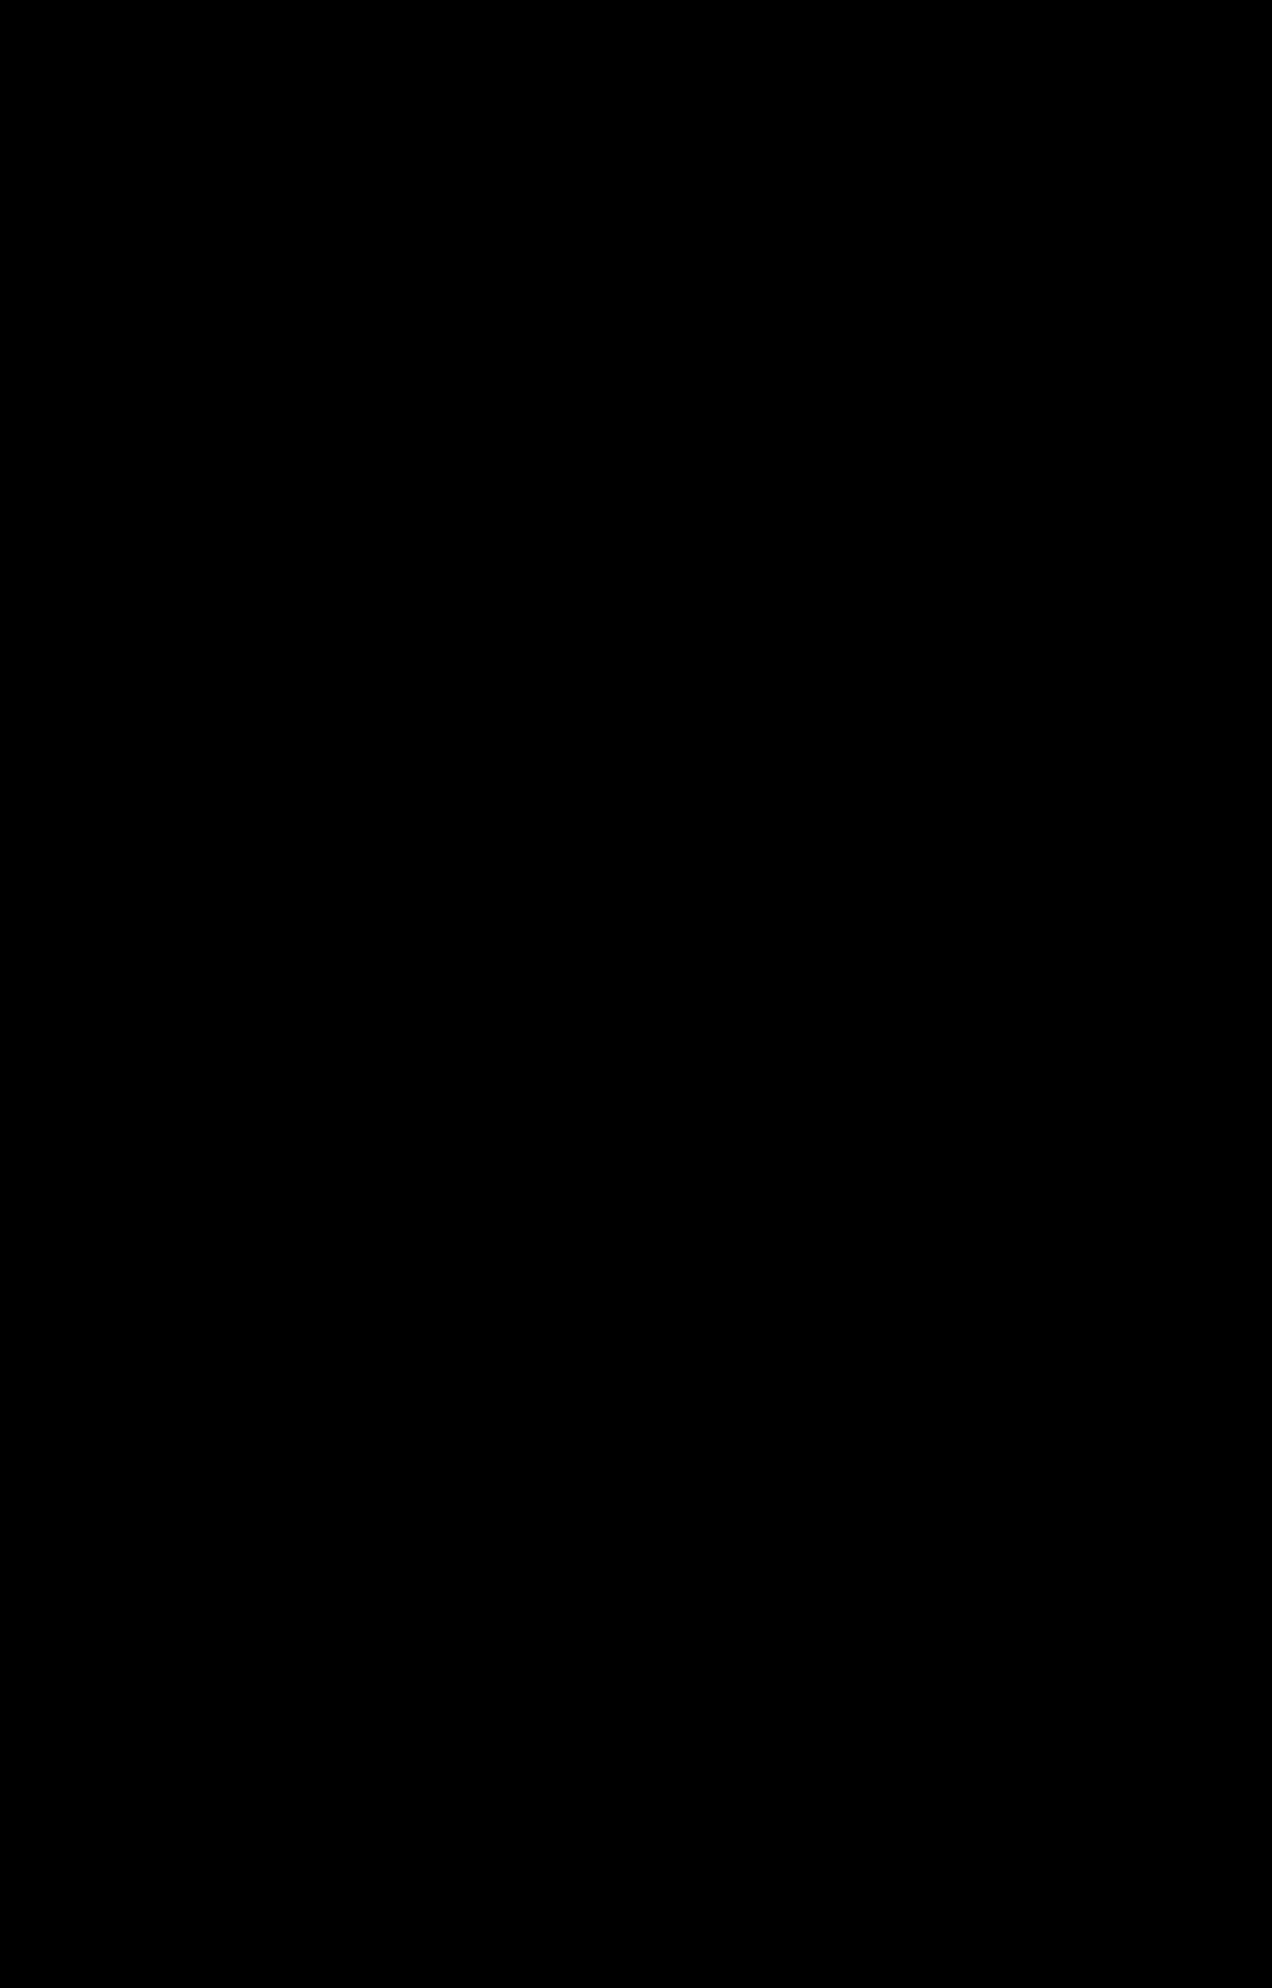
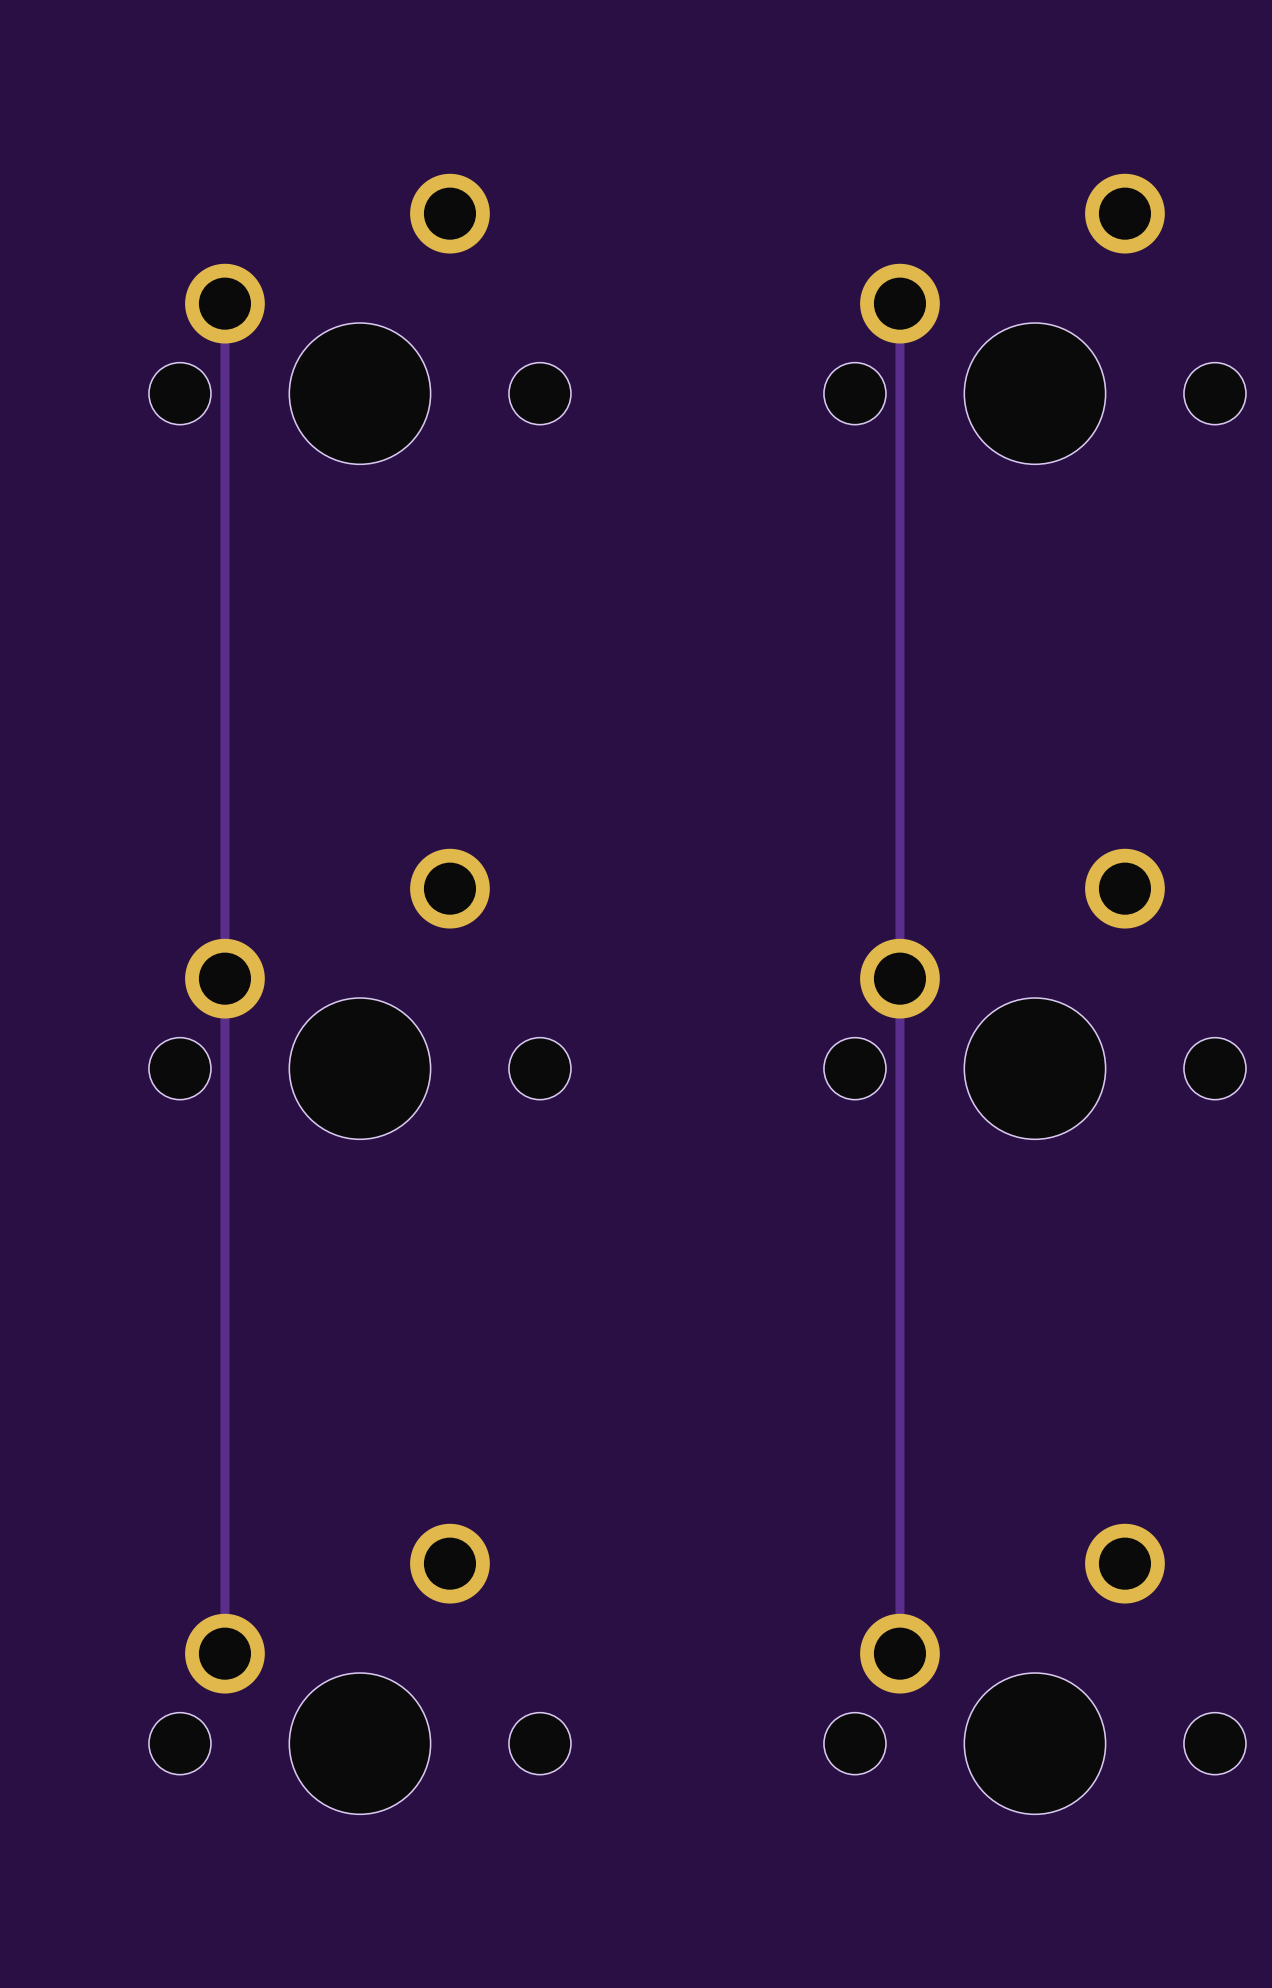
track: none -> (224, 303) (224, 1653)
track: none -> (899, 303) (899, 1653)
part: none -> (359, 319)
part: none -> (1034, 319)
part: none -> (359, 994)
part: none -> (1034, 994)
part: none -> (359, 1669)
part: none -> (1034, 1669)

